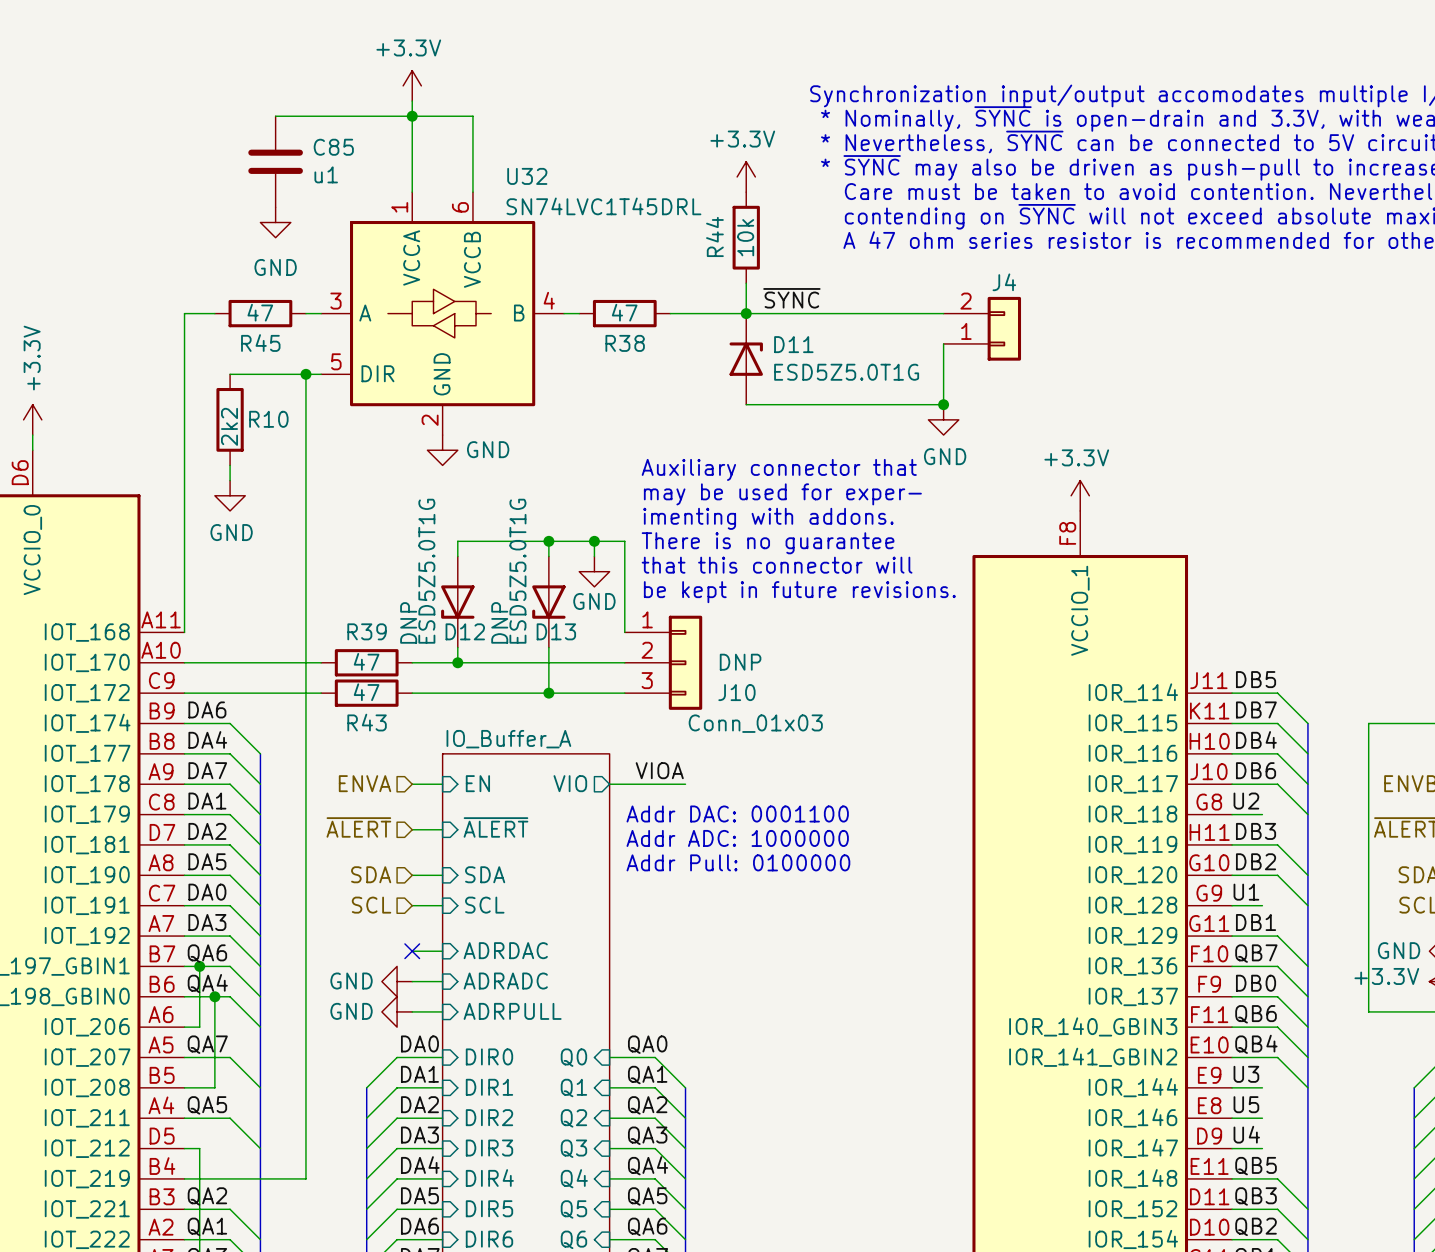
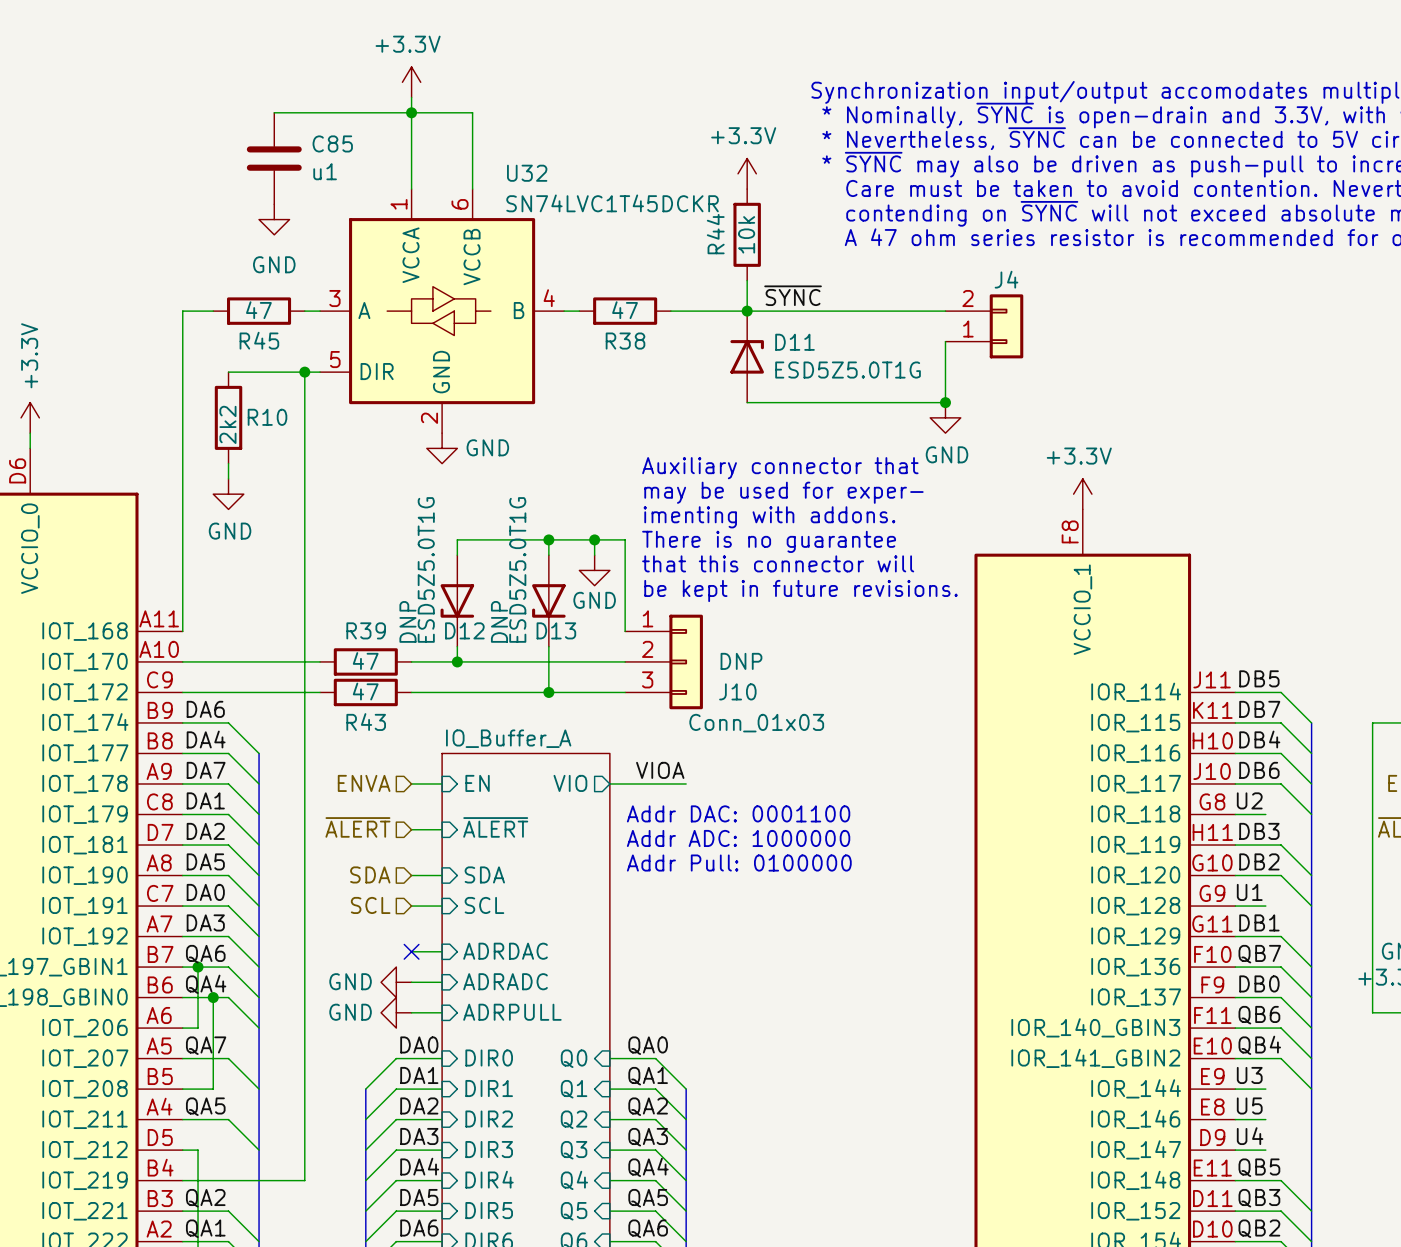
U32 value: SN74LVC1T45DRL (603, 206) -> SN74LVC1T45DCKR (612, 203)

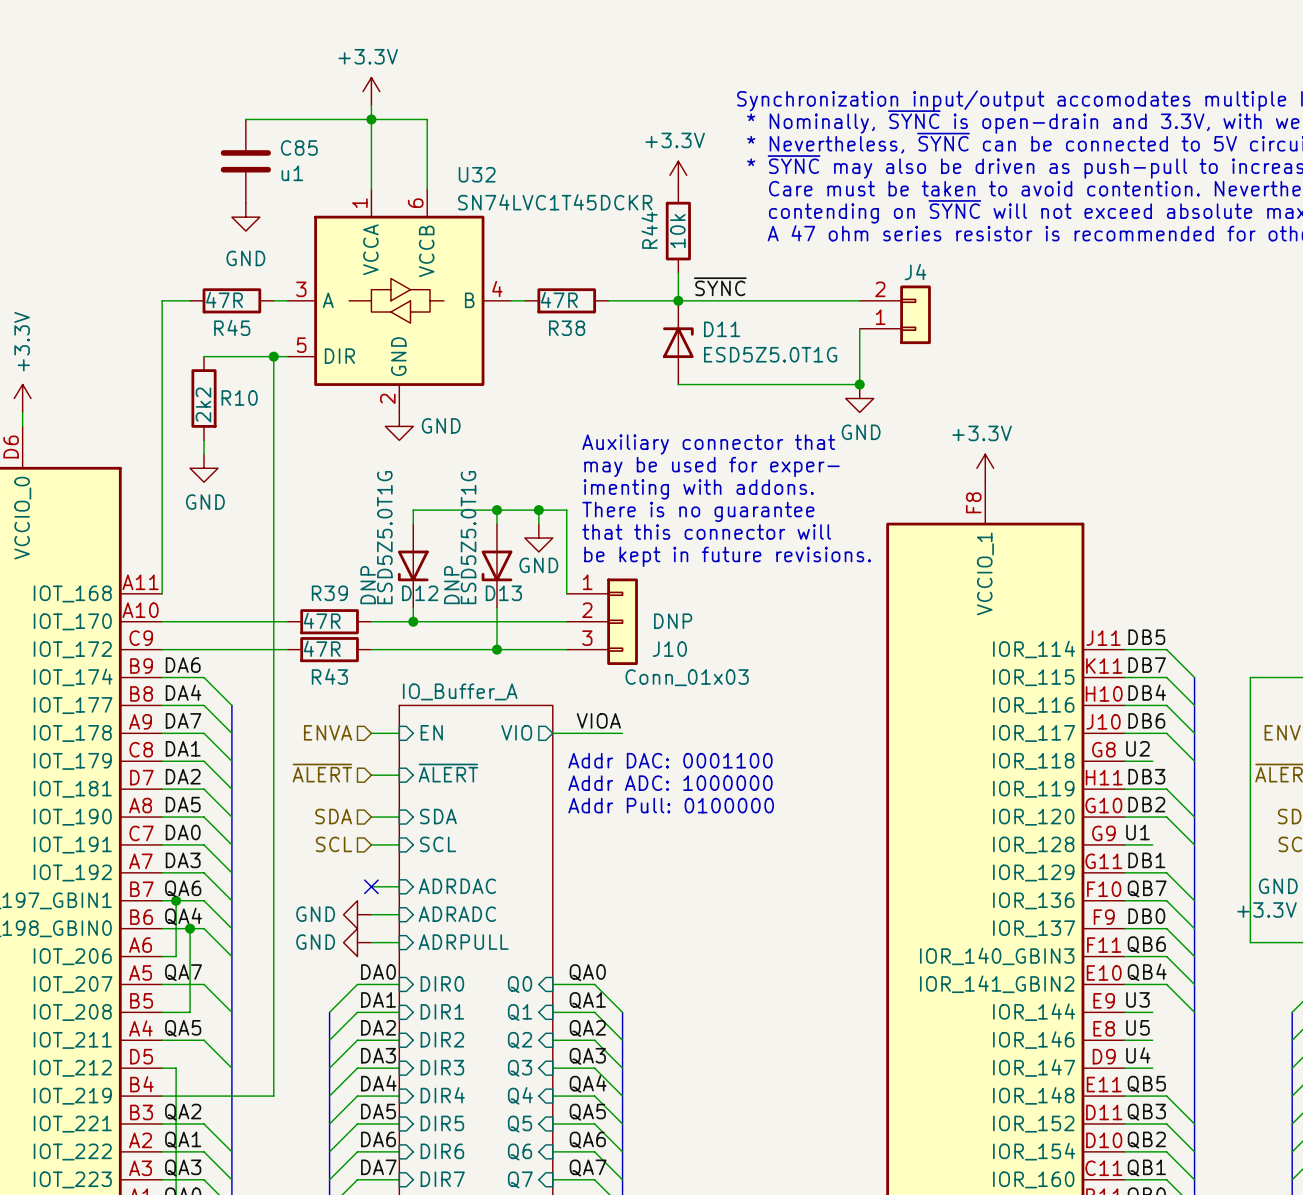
R45 value: 47 (258, 310) -> 47R (224, 299)
R38 value: 47 (625, 310) -> 47R (559, 299)
R39 value: 47 (365, 661) -> 47R (322, 620)
R43 value: 47 (365, 691) -> 47R (322, 648)

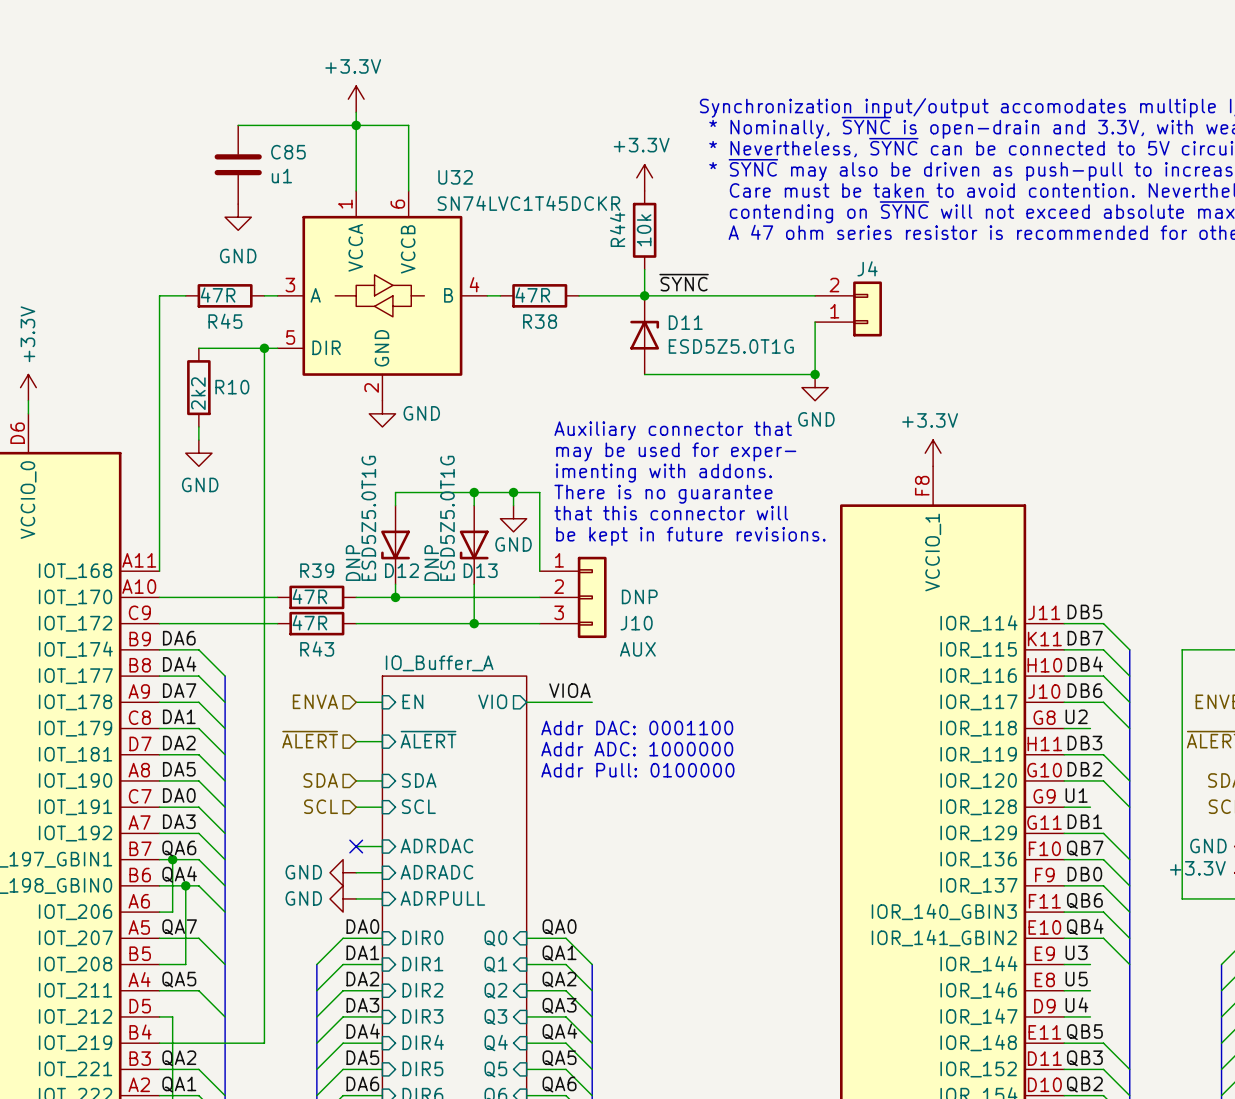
J10 value: Conn_01x03 (687, 677) -> AUX (637, 649)

